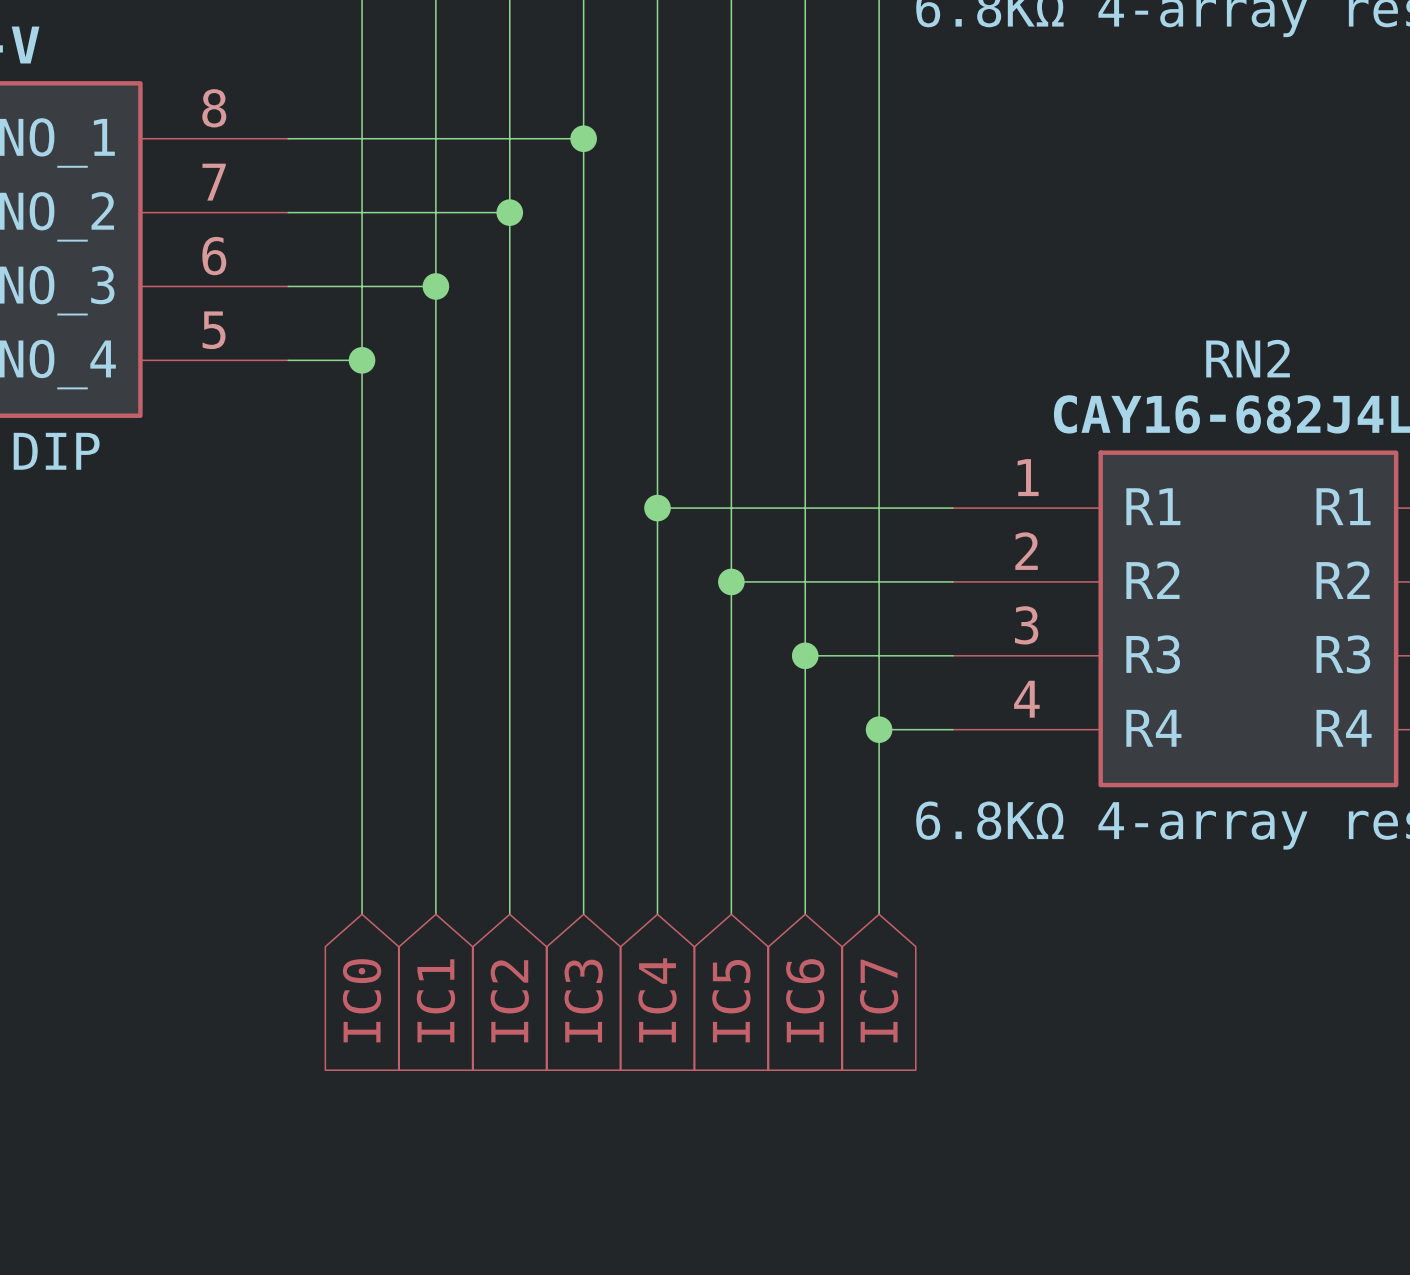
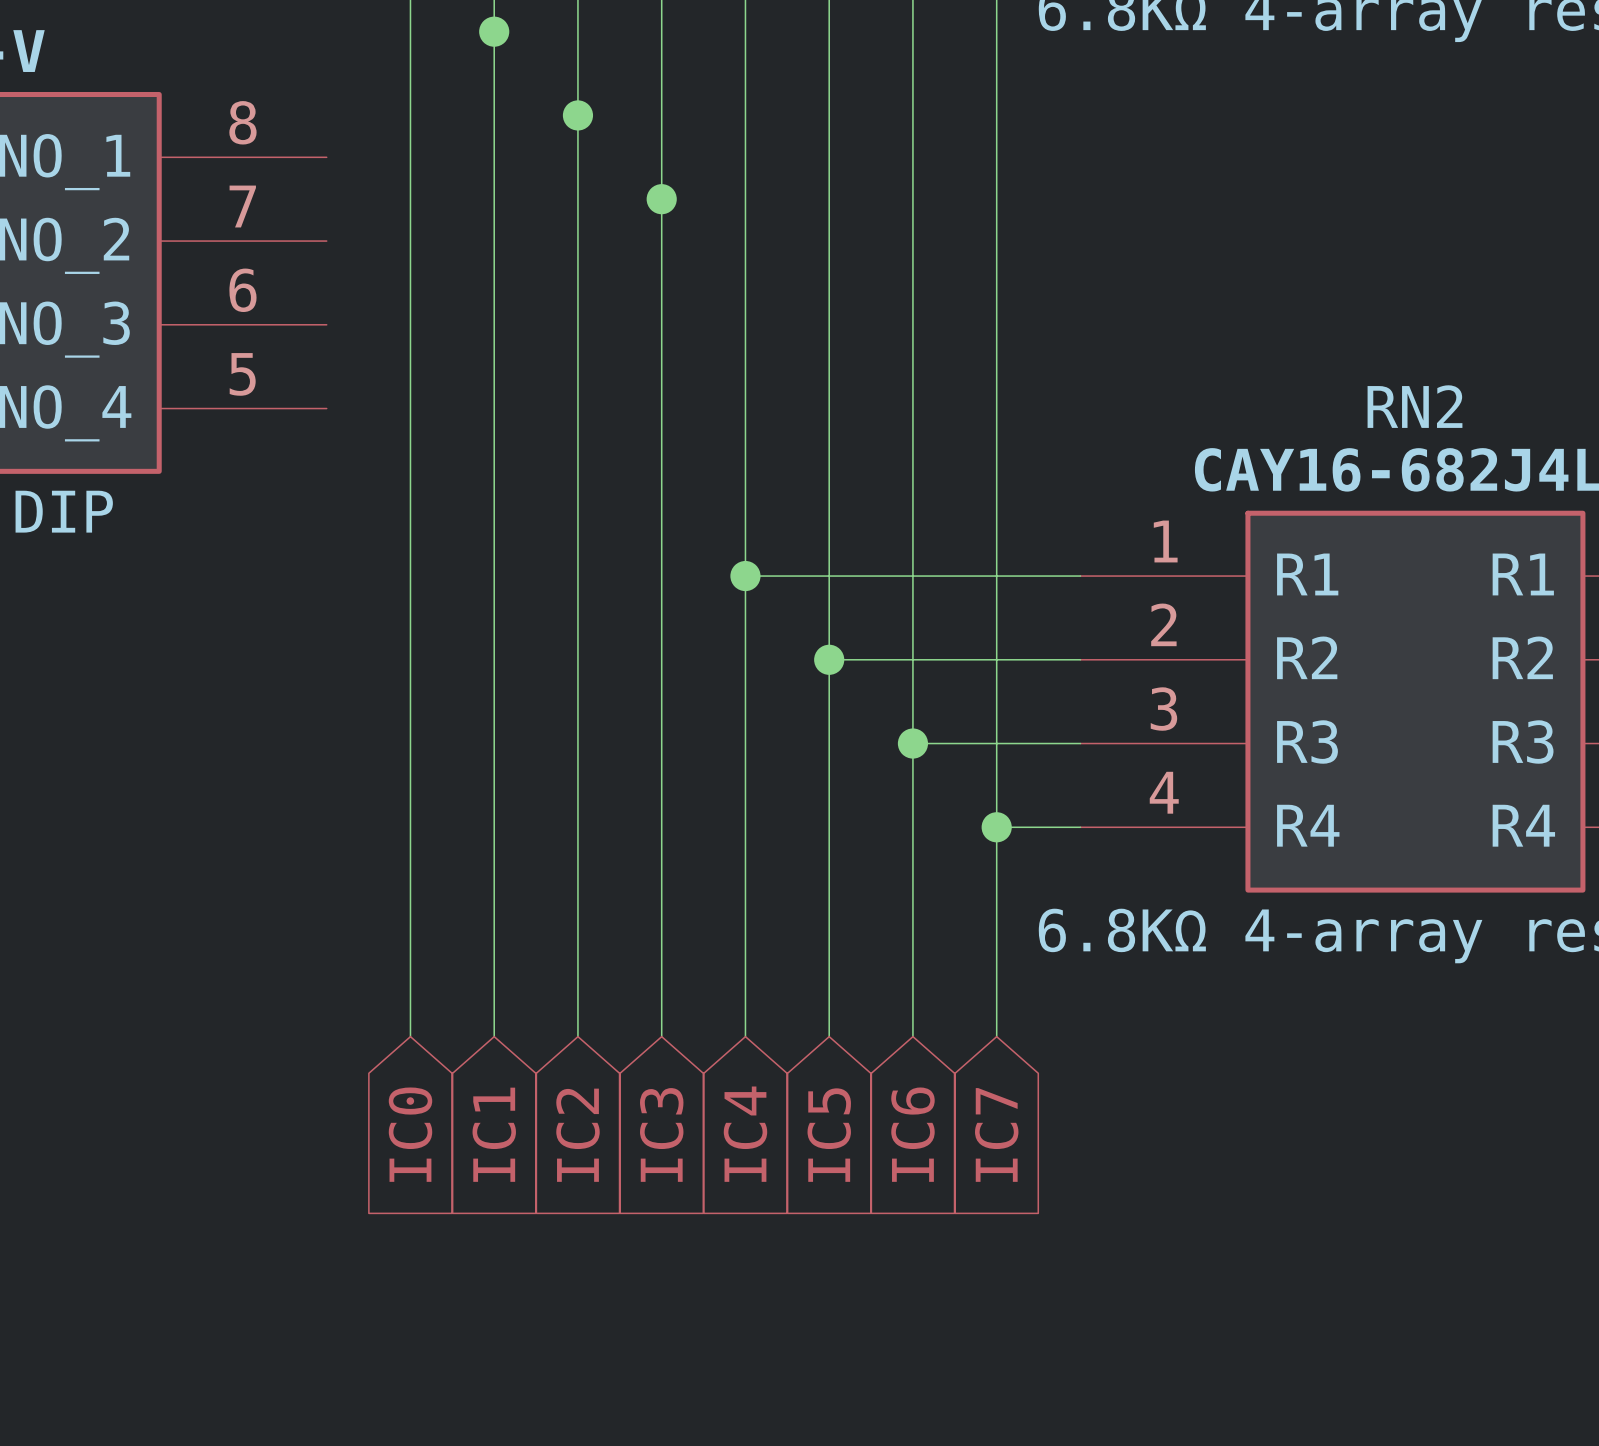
junction: none -> (494, 31)
junction: none -> (577, 115)
wire: (288, 138) (583, 138) -> none
junction position: (583, 138) -> (661, 199)
wire: (288, 212) (509, 212) -> none
junction: (509, 212) -> none
wire: (288, 286) (435, 286) -> none
junction: (435, 286) -> none
wire: (288, 360) (362, 360) -> none
junction: (362, 360) -> none

